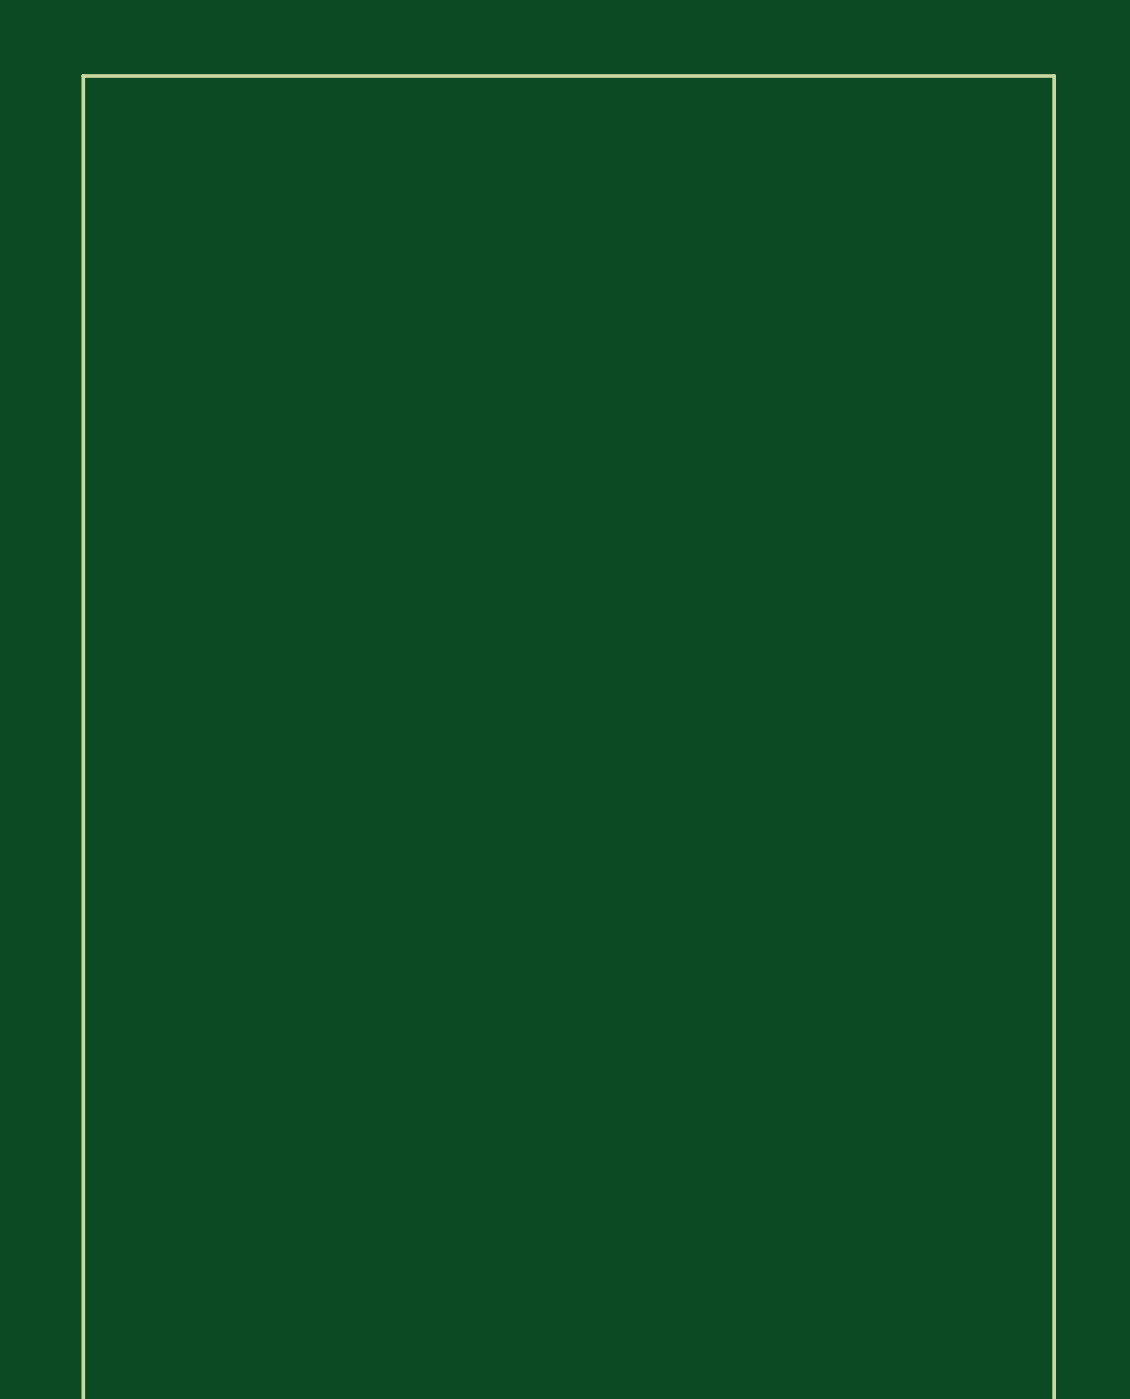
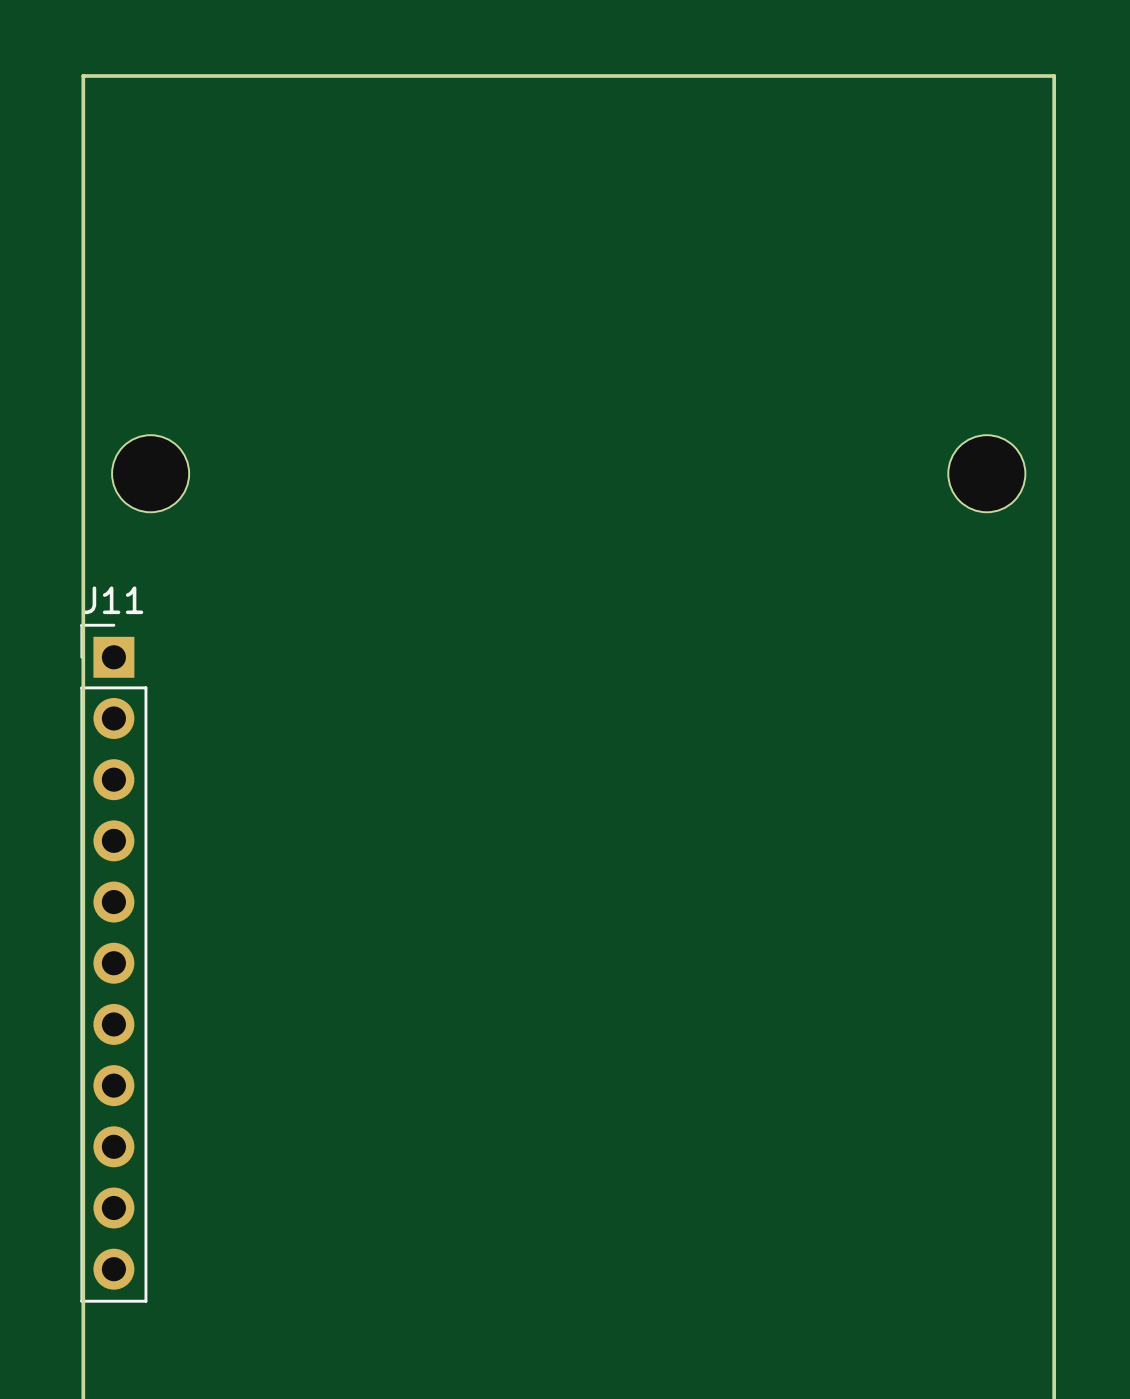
part: none -> (150, 473)
part: none -> (986, 473)
J11: none -> (113, 963)

